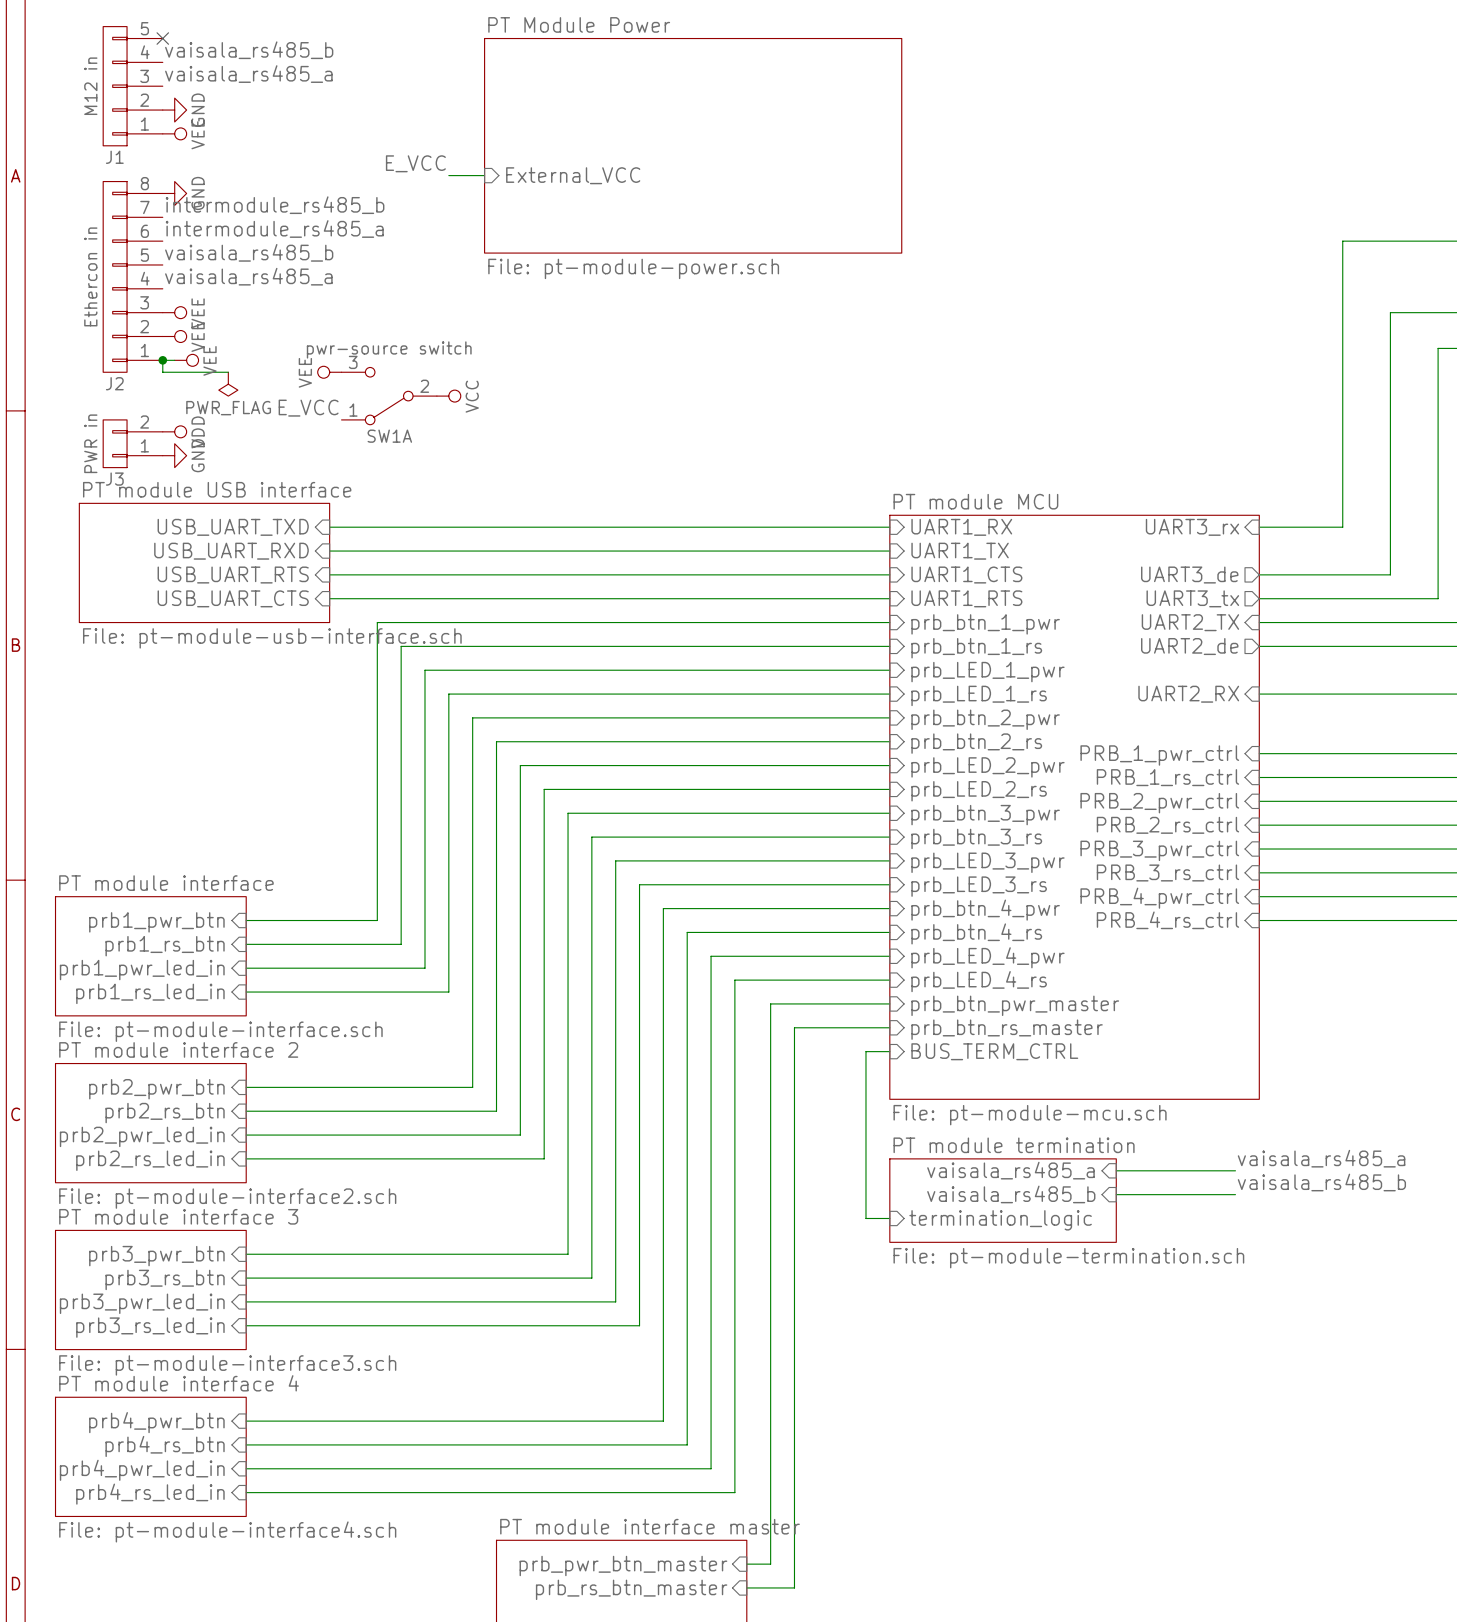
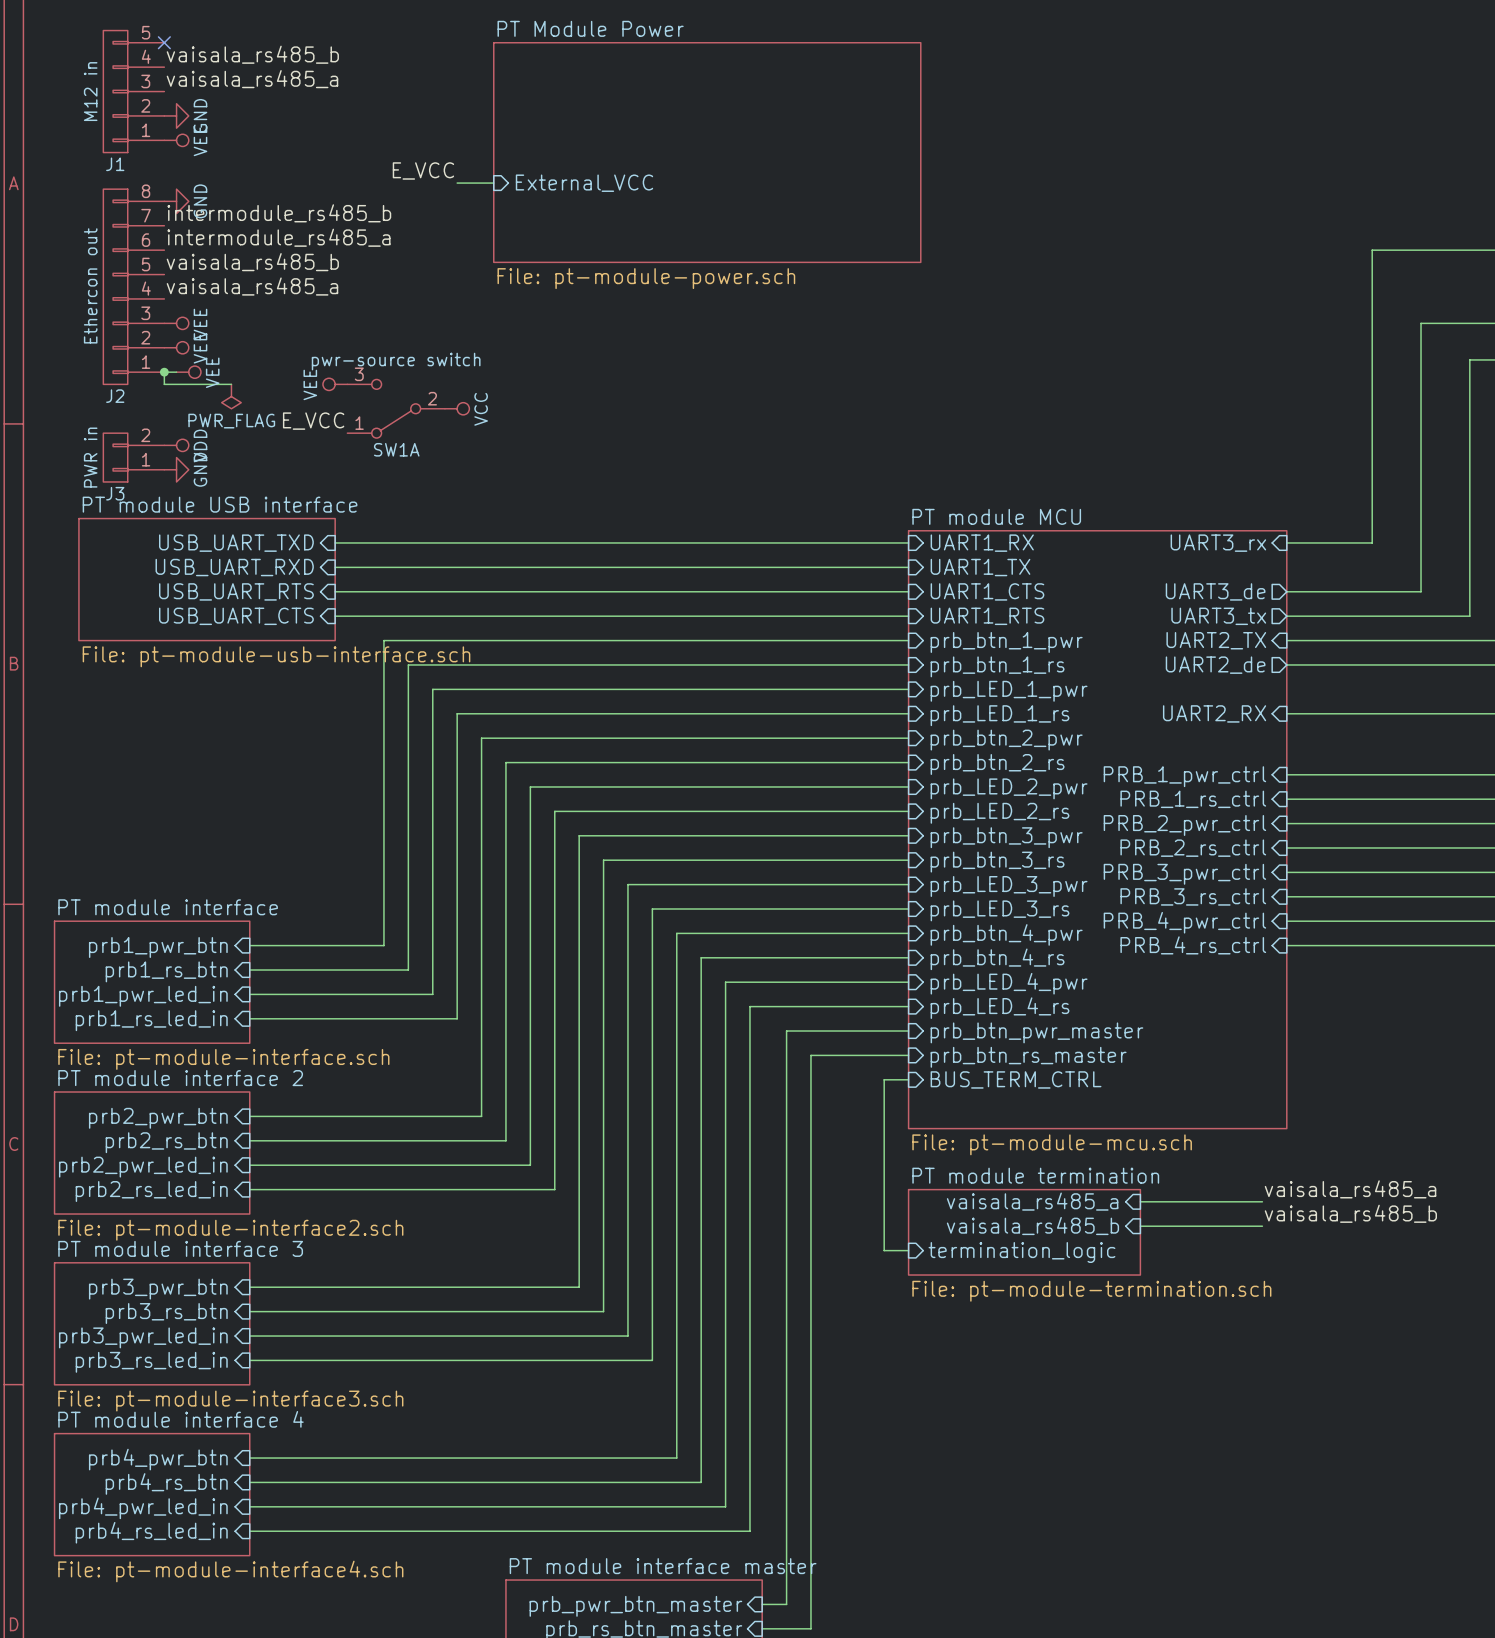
J2 value: Ethercon in (90, 276) -> Ethercon out (90, 285)

